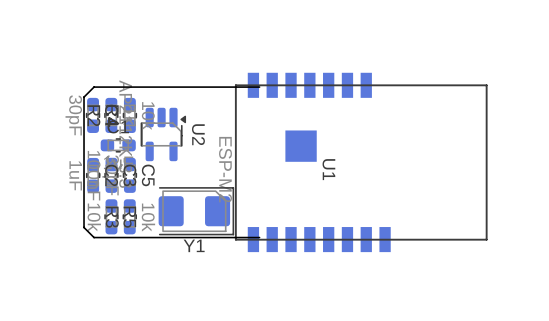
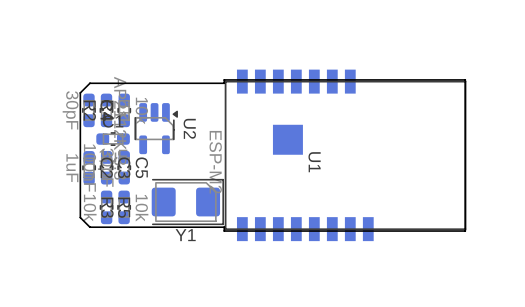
part footprint: [83, 86, 260, 238] -> [80, 82, 225, 228]
board edge: none -> (224, 83) (224, 79) (465, 79) (465, 231) (224, 231) (224, 227)

